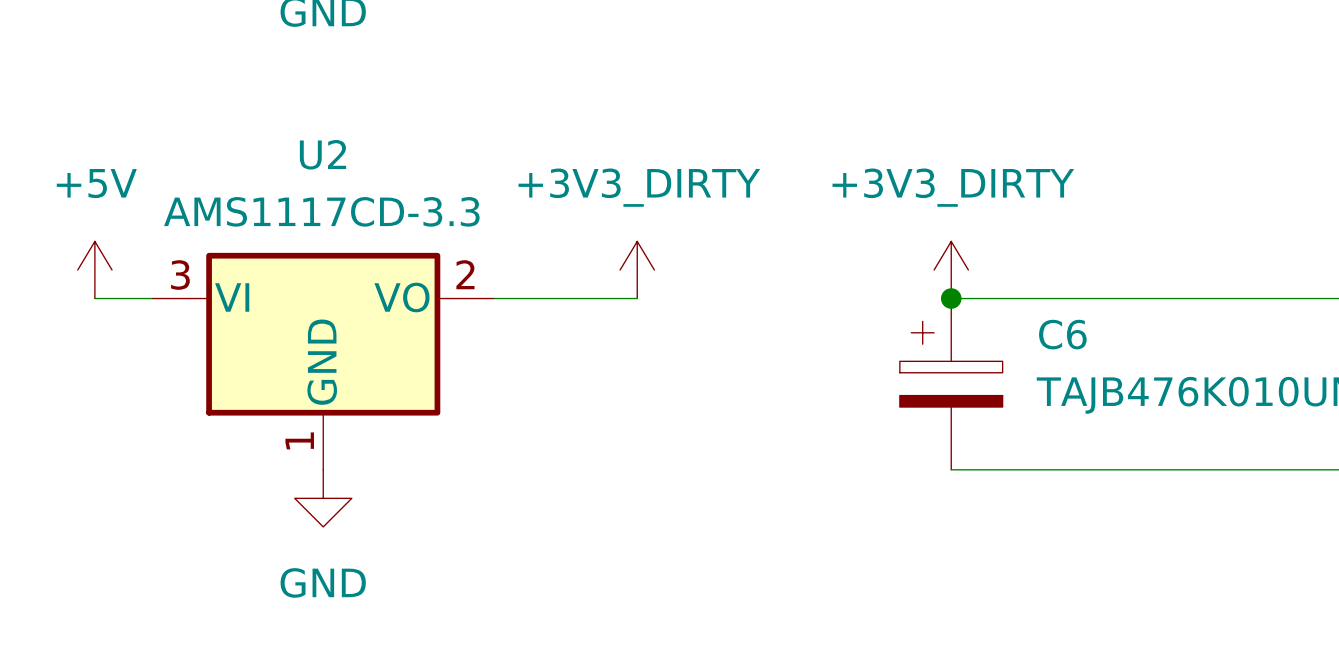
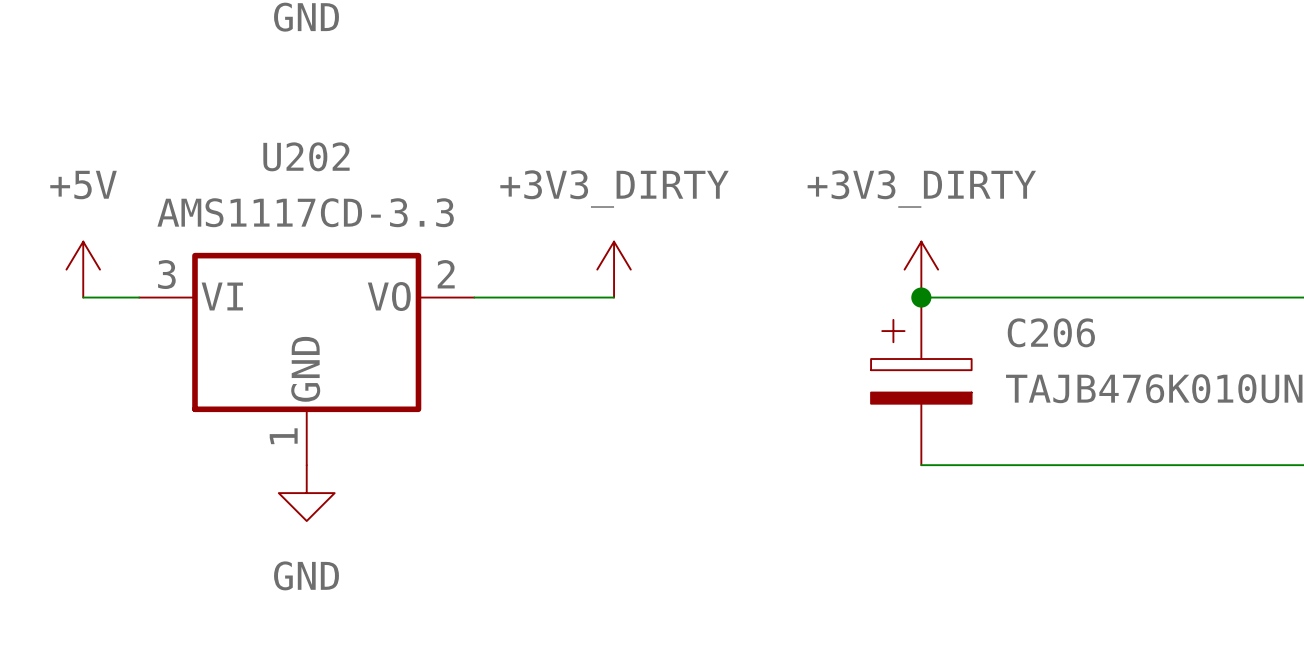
U2 name: U2 (322, 154) -> U202 (306, 156)
C6 name: C6 (1062, 334) -> C206 (1051, 332)

